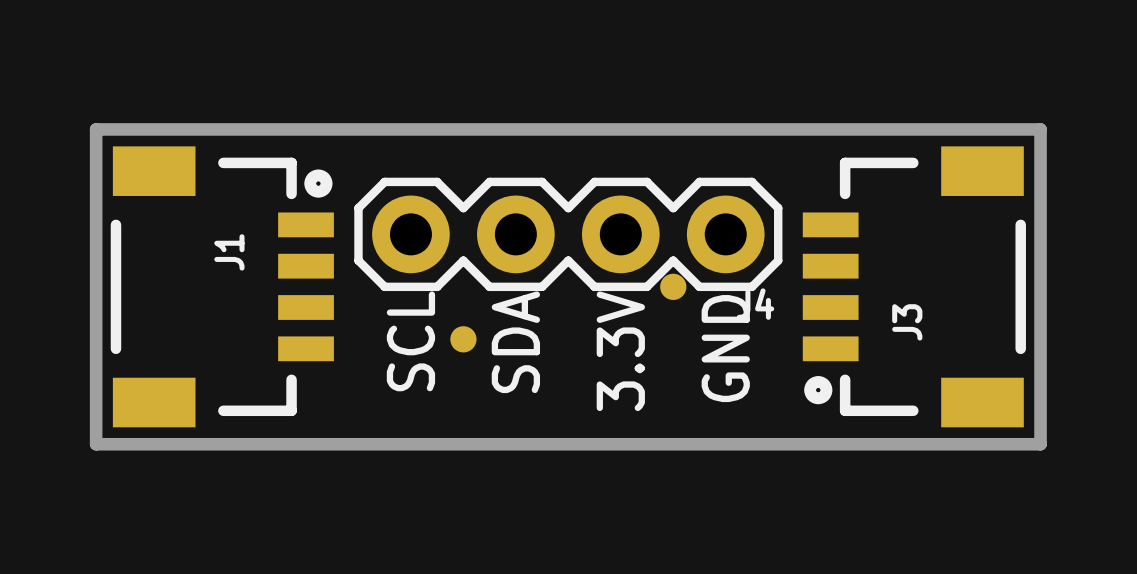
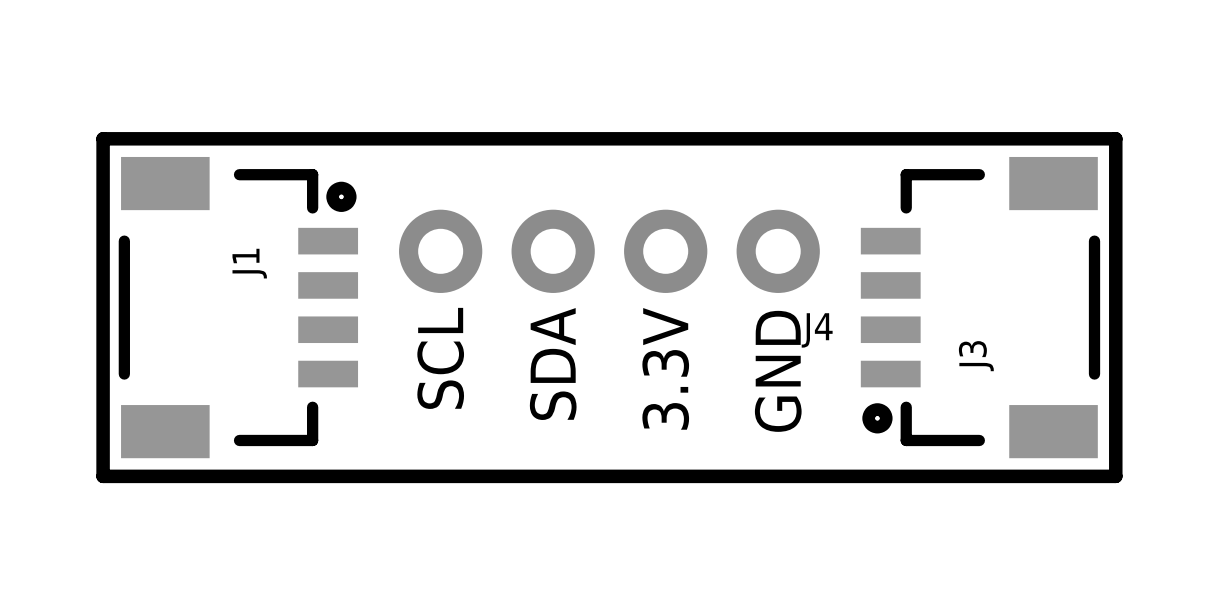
J4 footprint: [354, 177, 783, 292] -> [399, 209, 820, 293]
part: (673, 286) -> none
part: (463, 339) -> none

